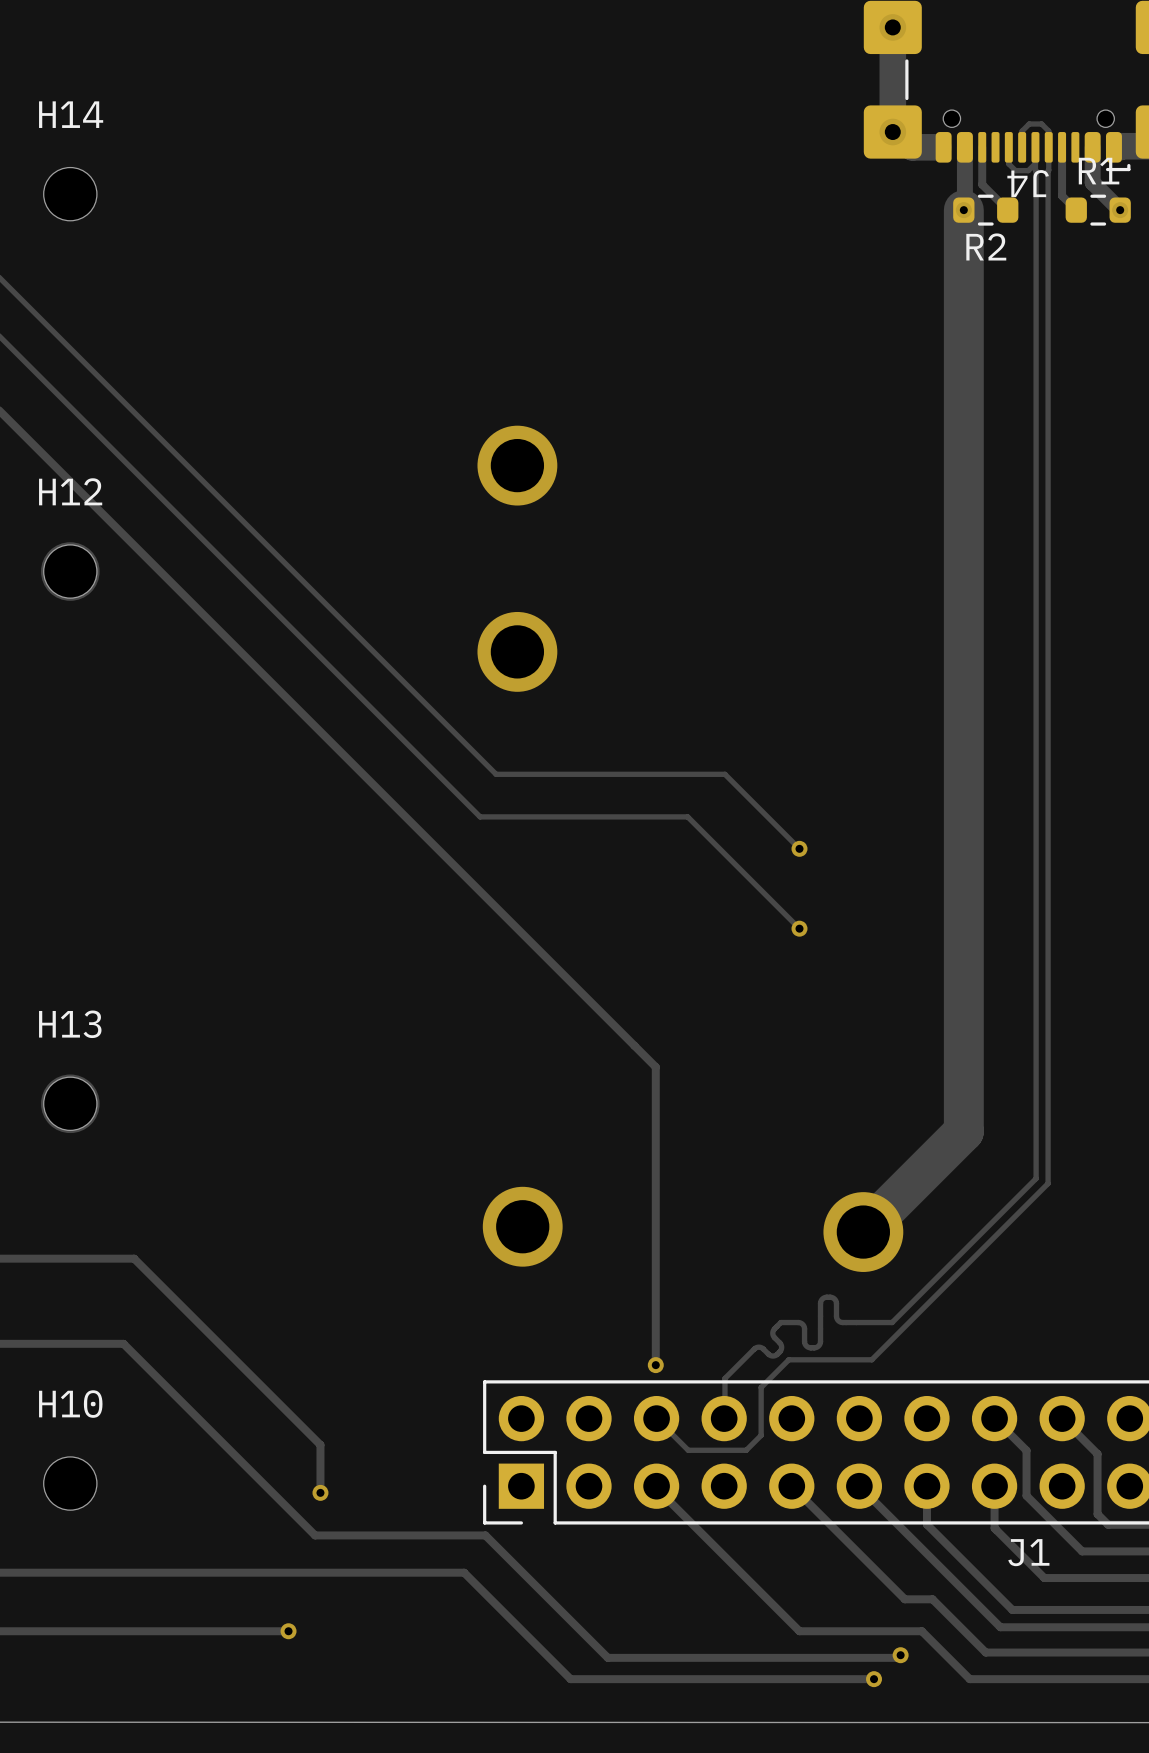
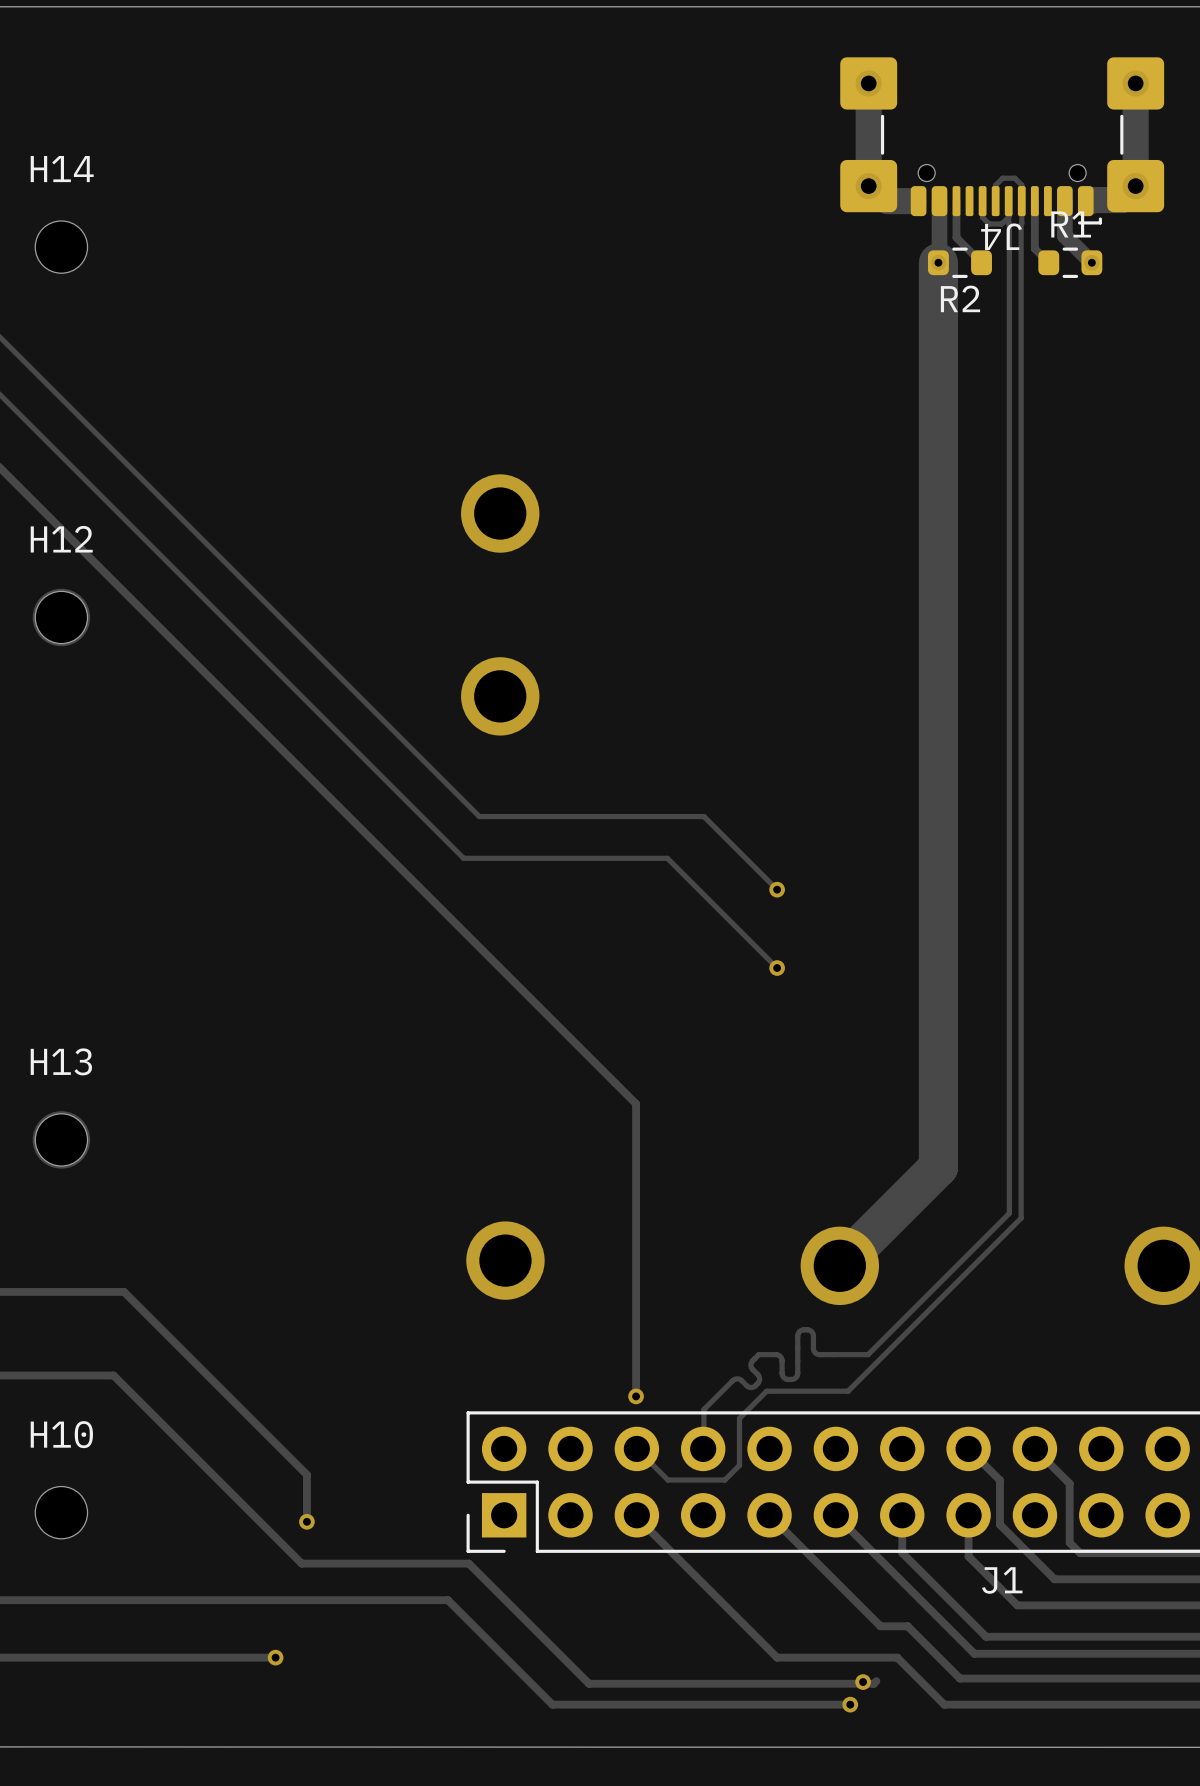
via position: (900, 1655) -> (863, 1682)

